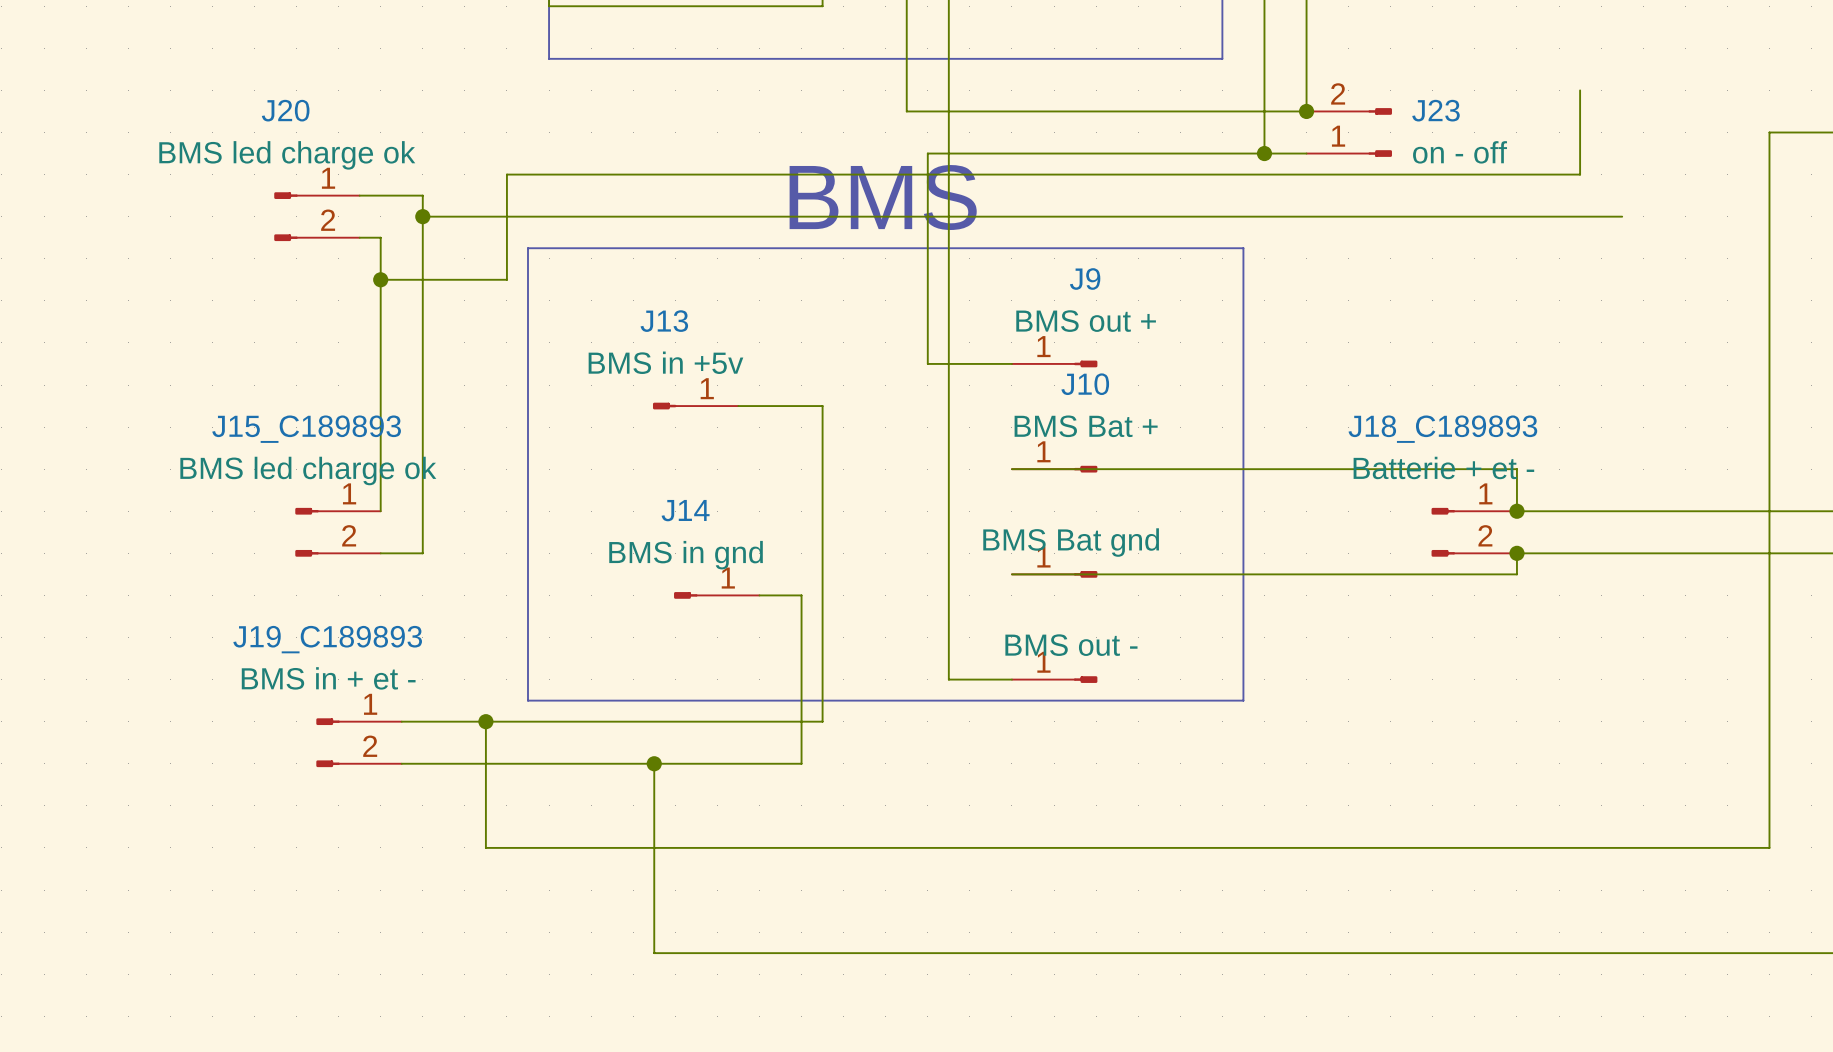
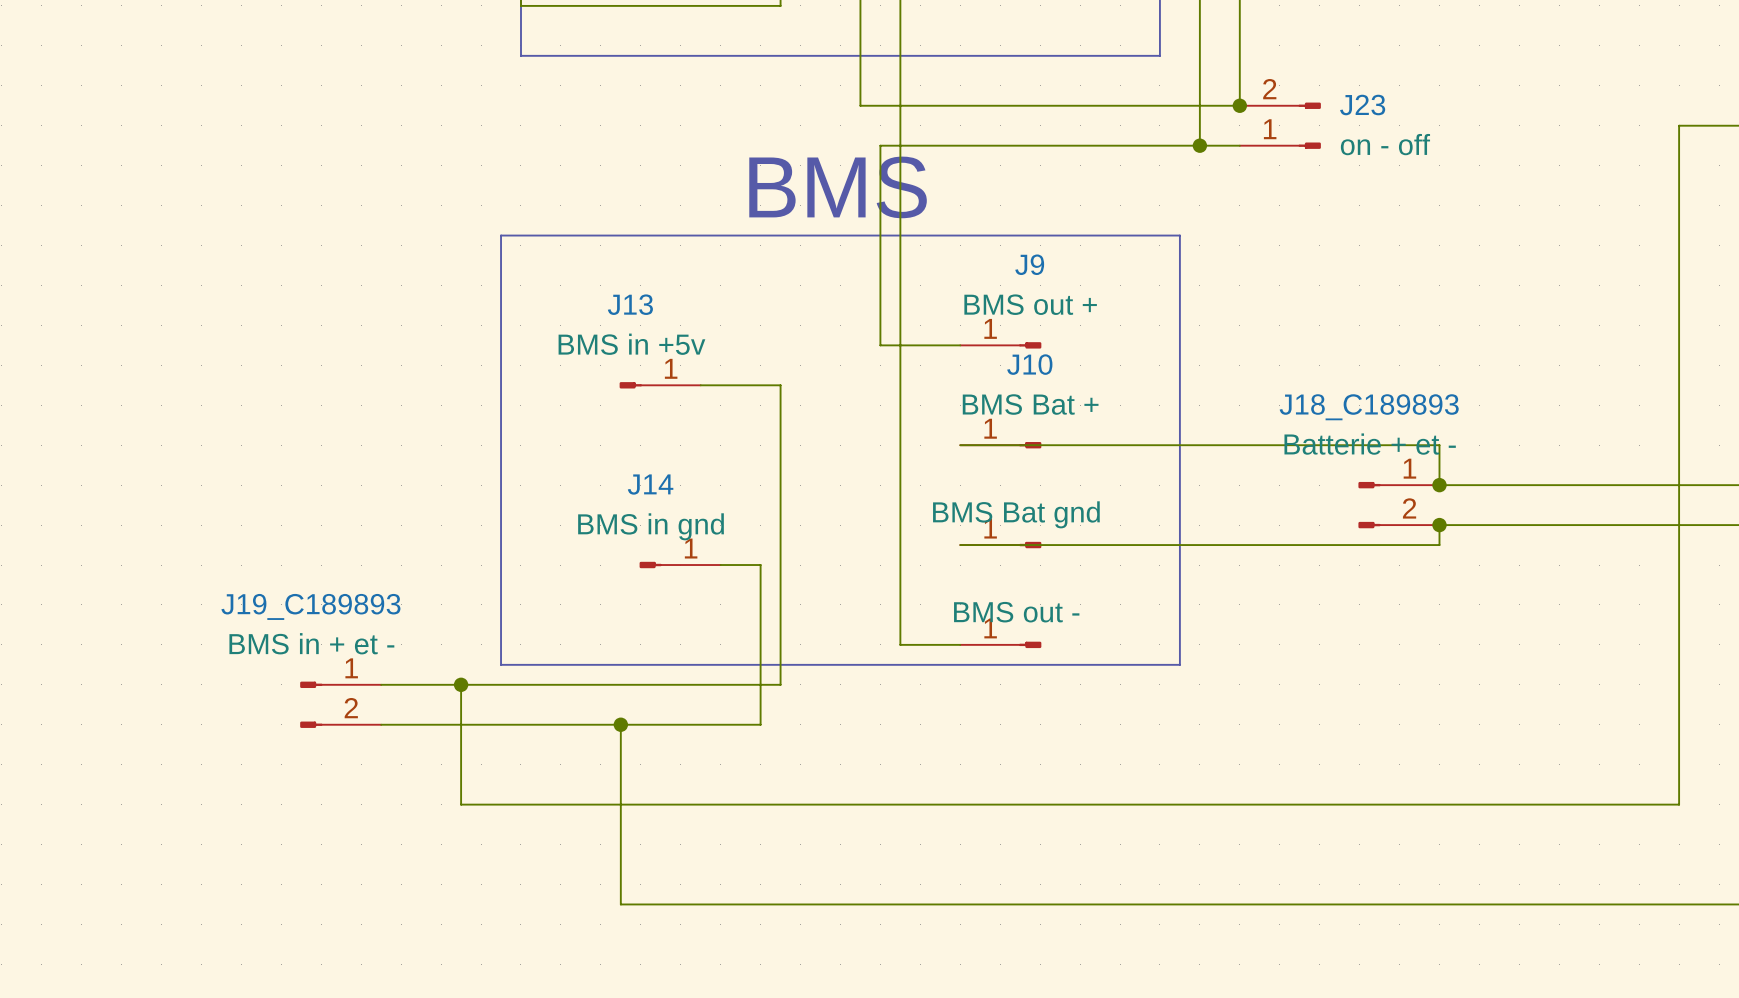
wire: (1580, 90) (1580, 174) (506, 174) (506, 279) (380, 279) -> none
wire: (359, 195) (422, 195) (422, 553) (380, 553) -> none
J20: BMS led charge ok (316, 216) -> none
wire: (422, 216) (1622, 216) -> none
junction: (422, 216) -> none
wire: (359, 237) (380, 237) (380, 511) -> none
junction: (380, 279) -> none
J15_C189893: BMS led charge ok (337, 532) -> none

